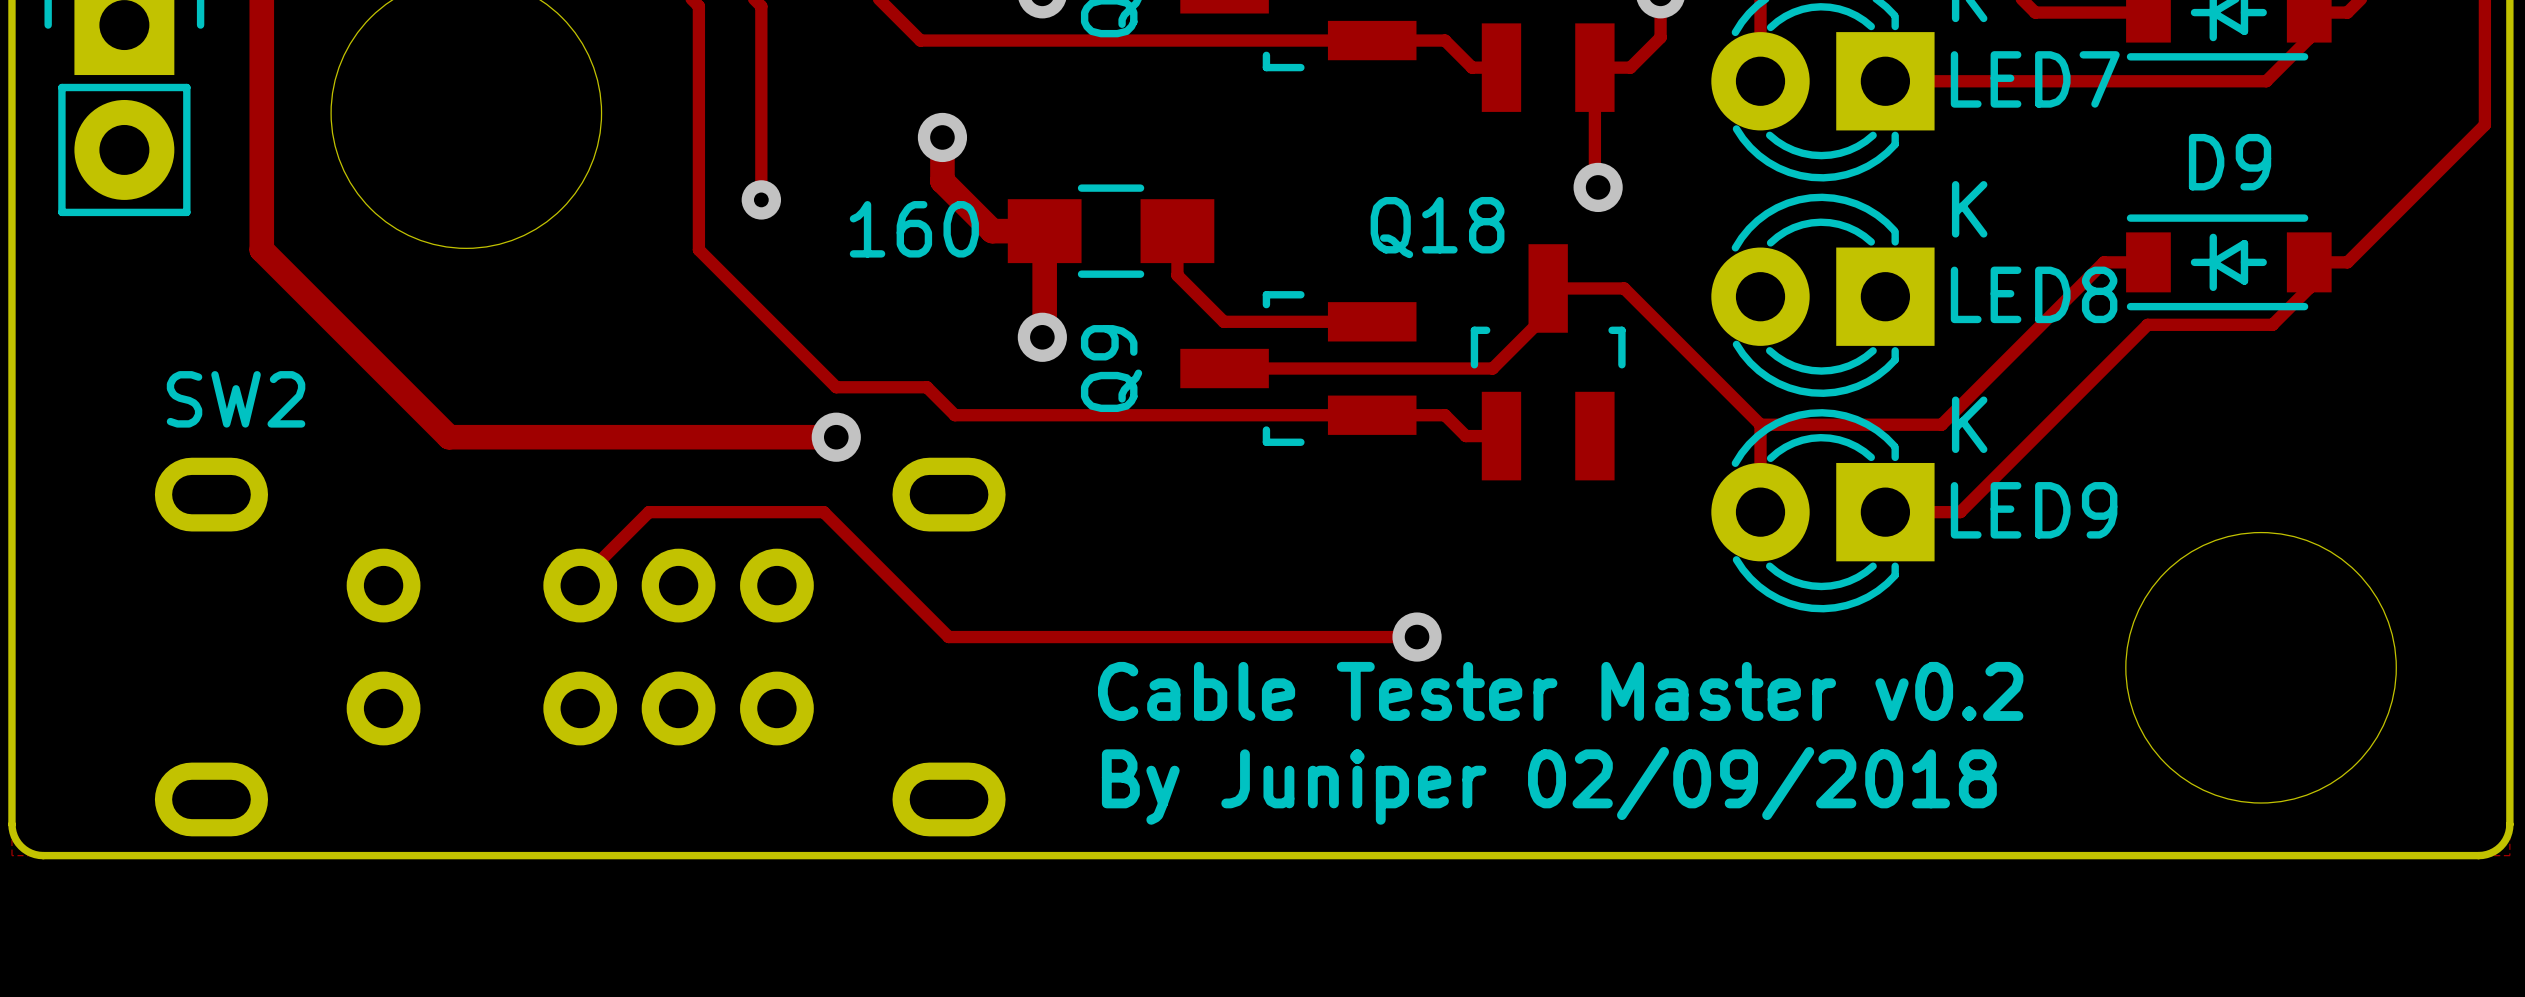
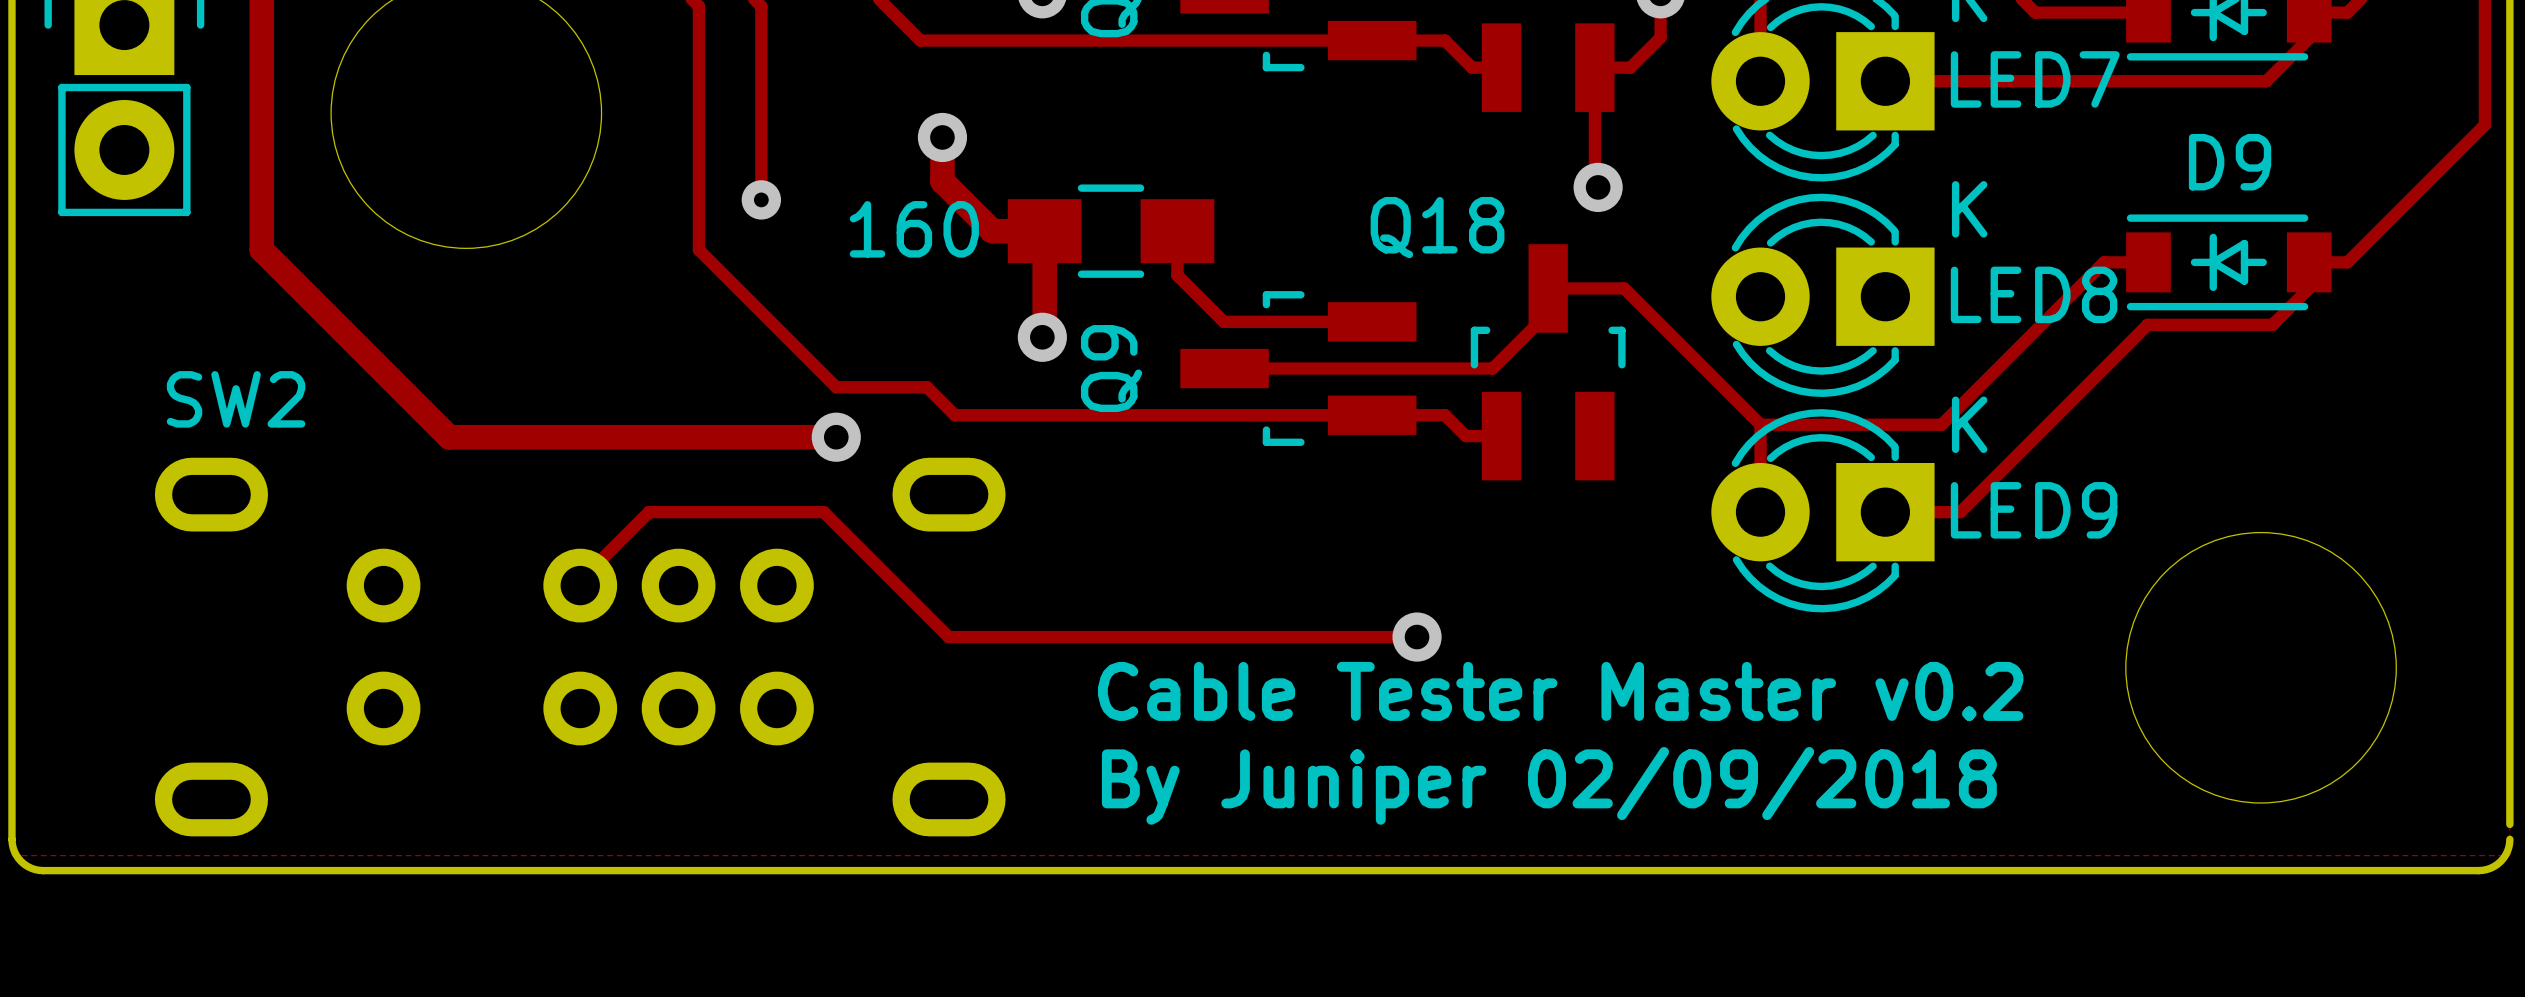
board edge: (11, 824) (14, 836) (21, 846) (31, 853) (43, 855) (2478, 855) (2490, 853) (2500, 846) (2507, 836) (2509, 824) -> (11, 824) (12, 843) (18, 858) (31, 868) (43, 870) (2478, 870) (2490, 868) (2500, 861) (2507, 851) (2509, 839)

